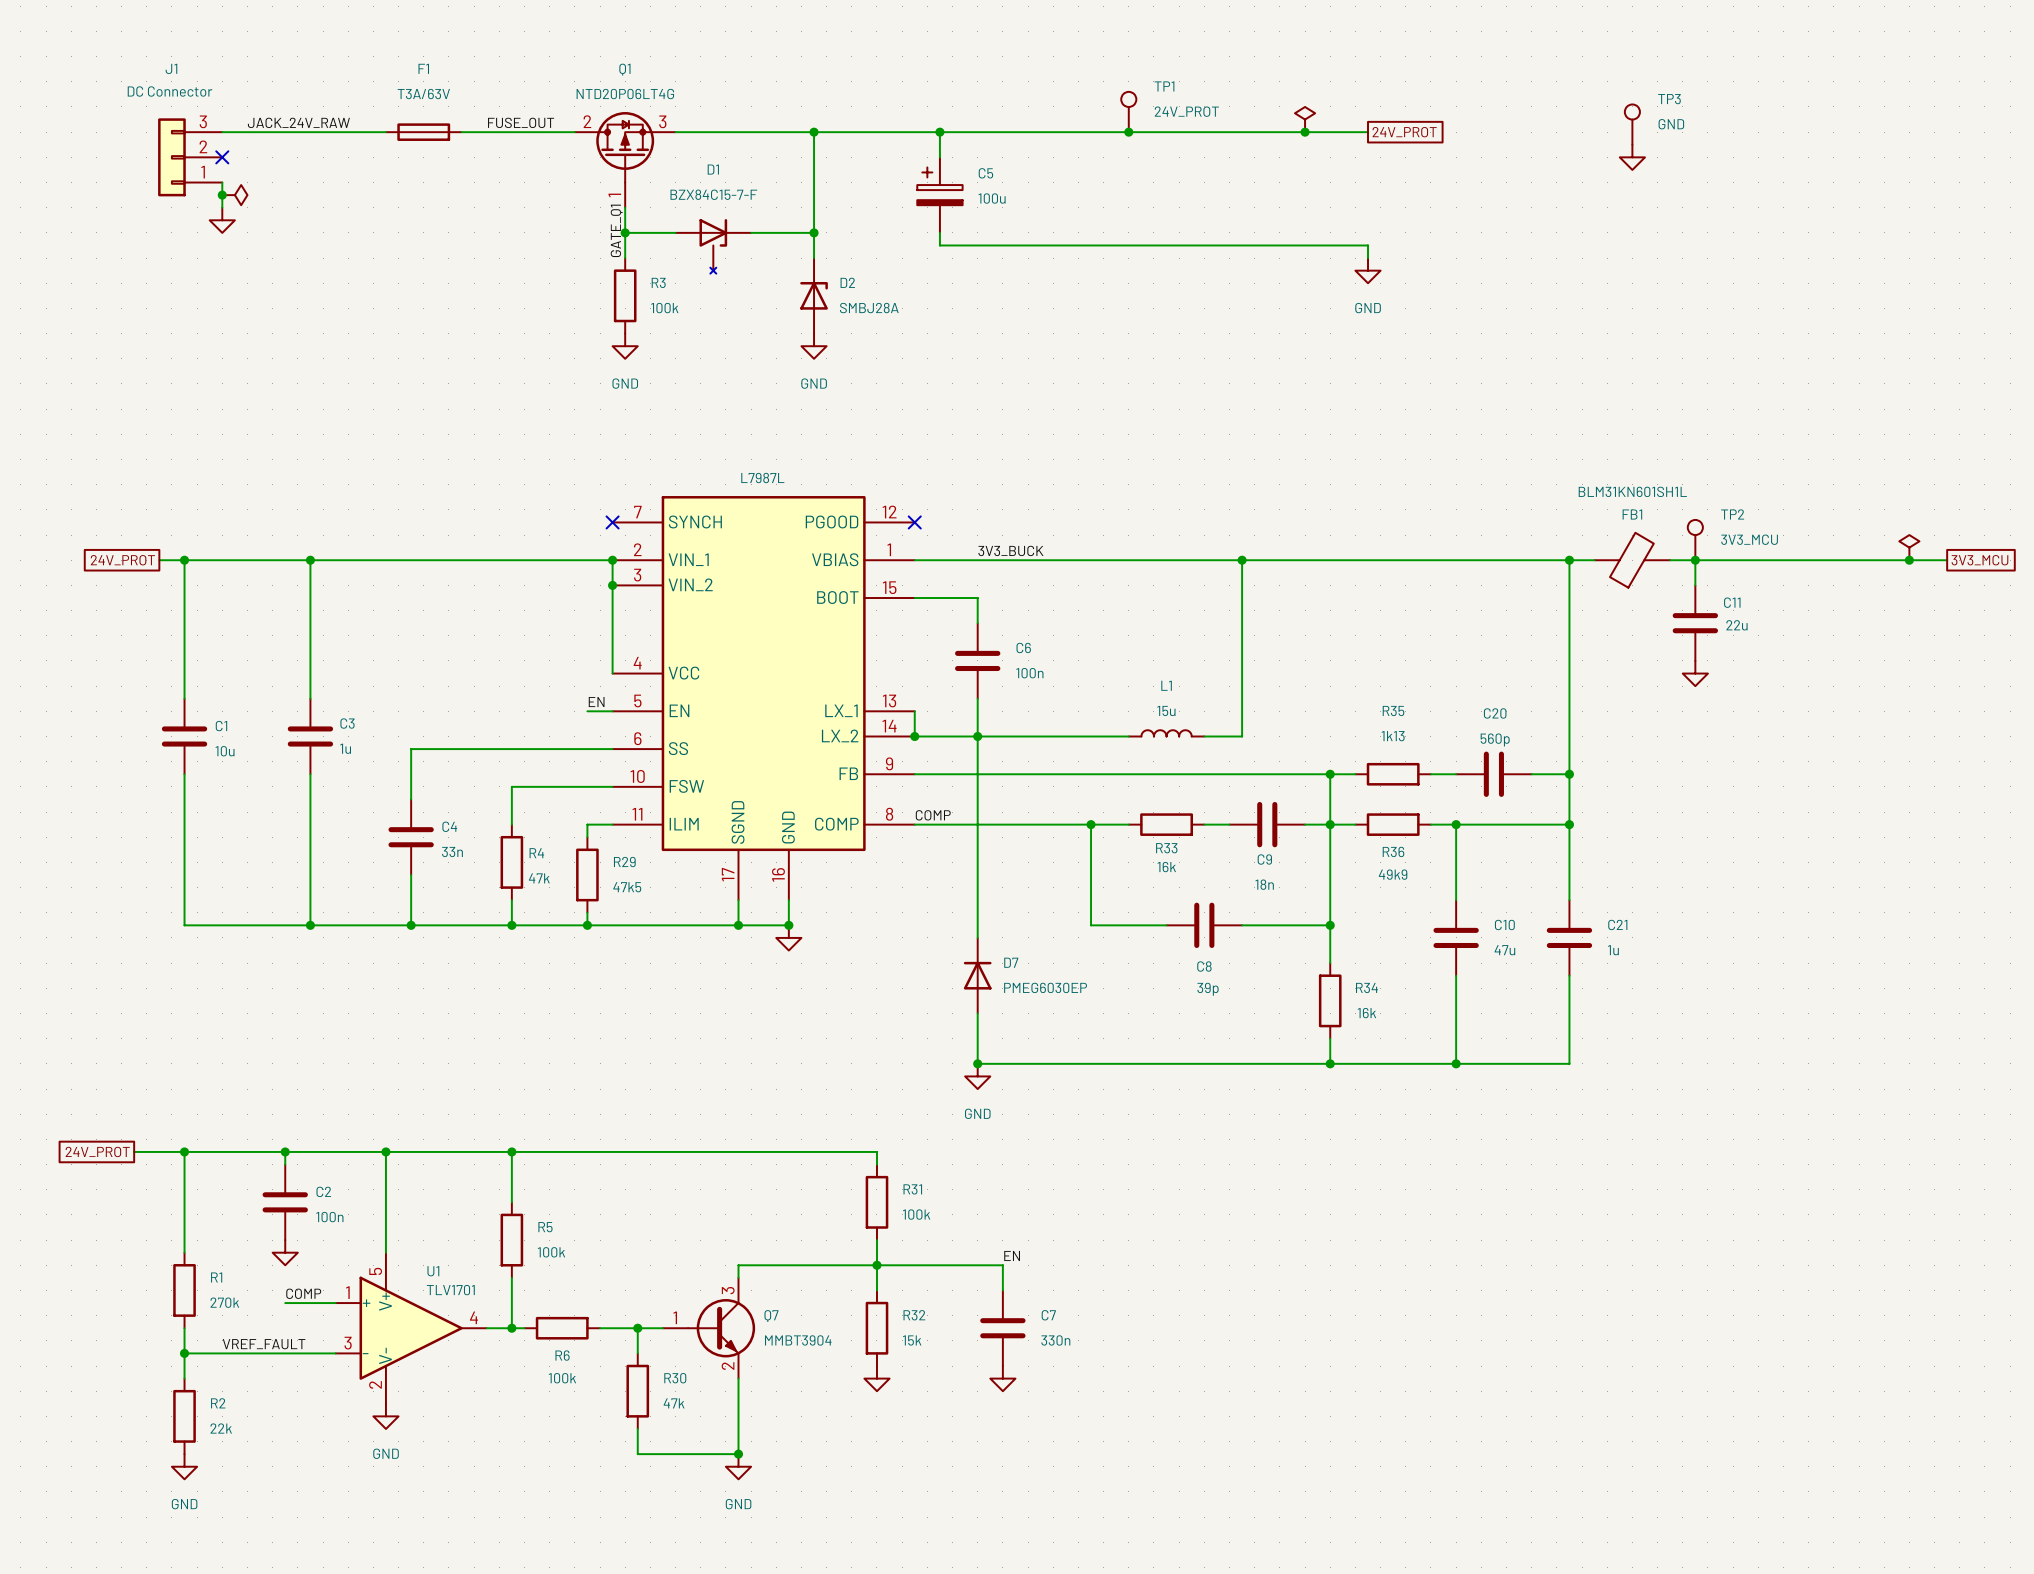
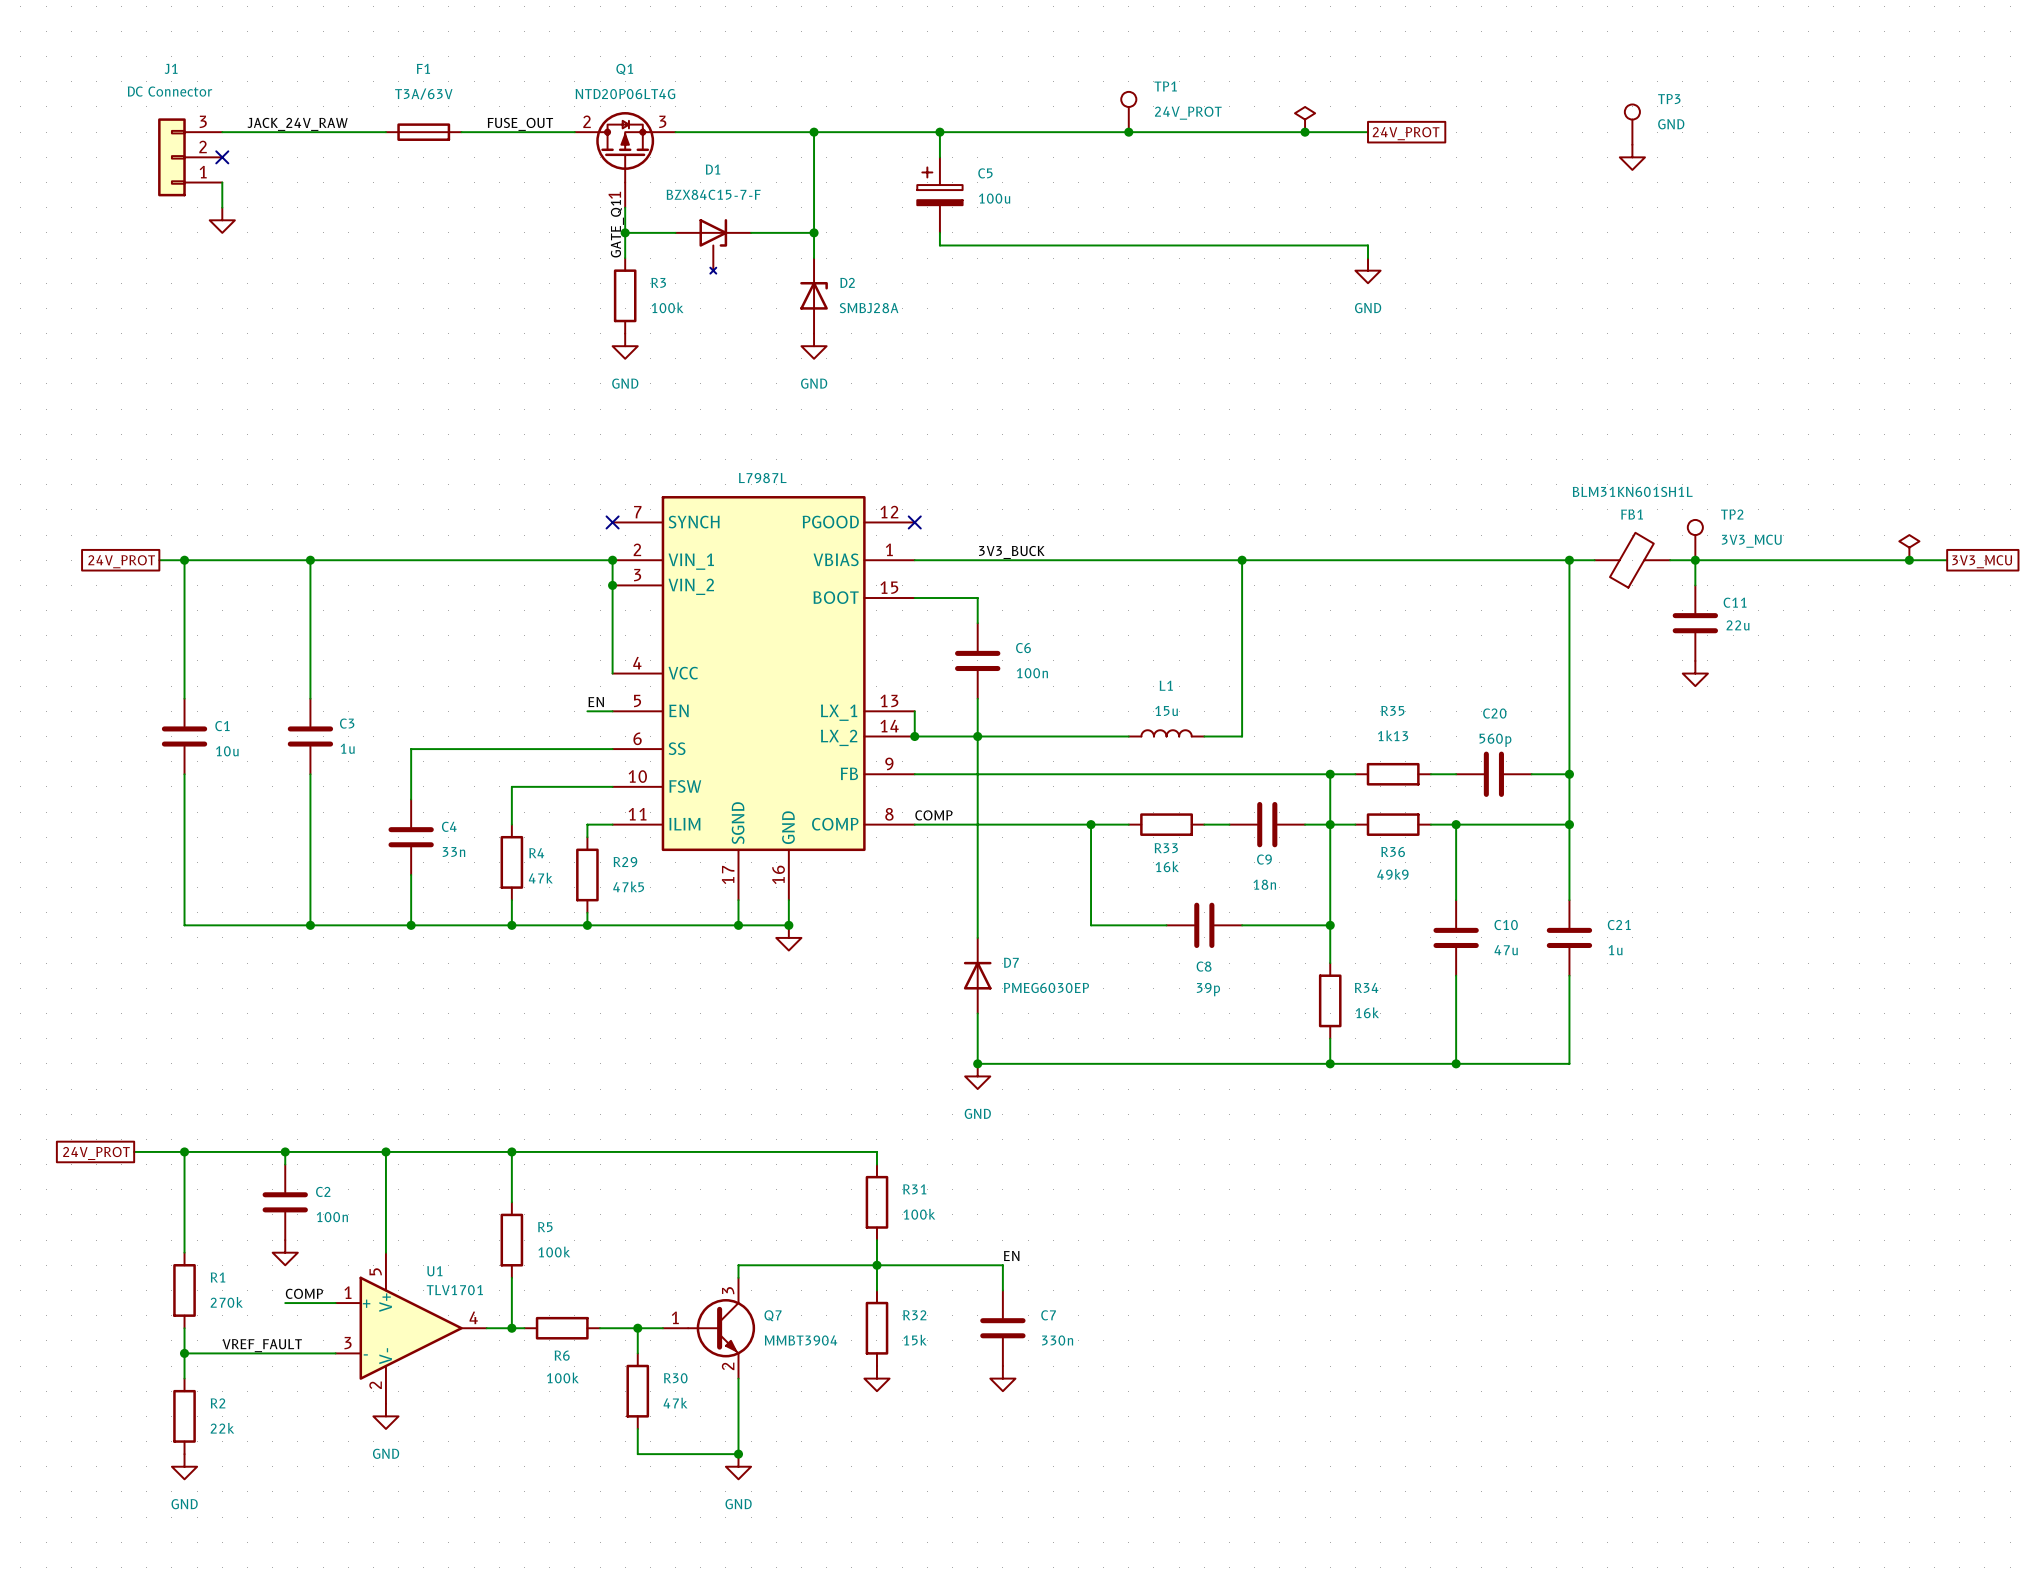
junction: (222, 195) -> none
power symbol: (234, 195) -> none

